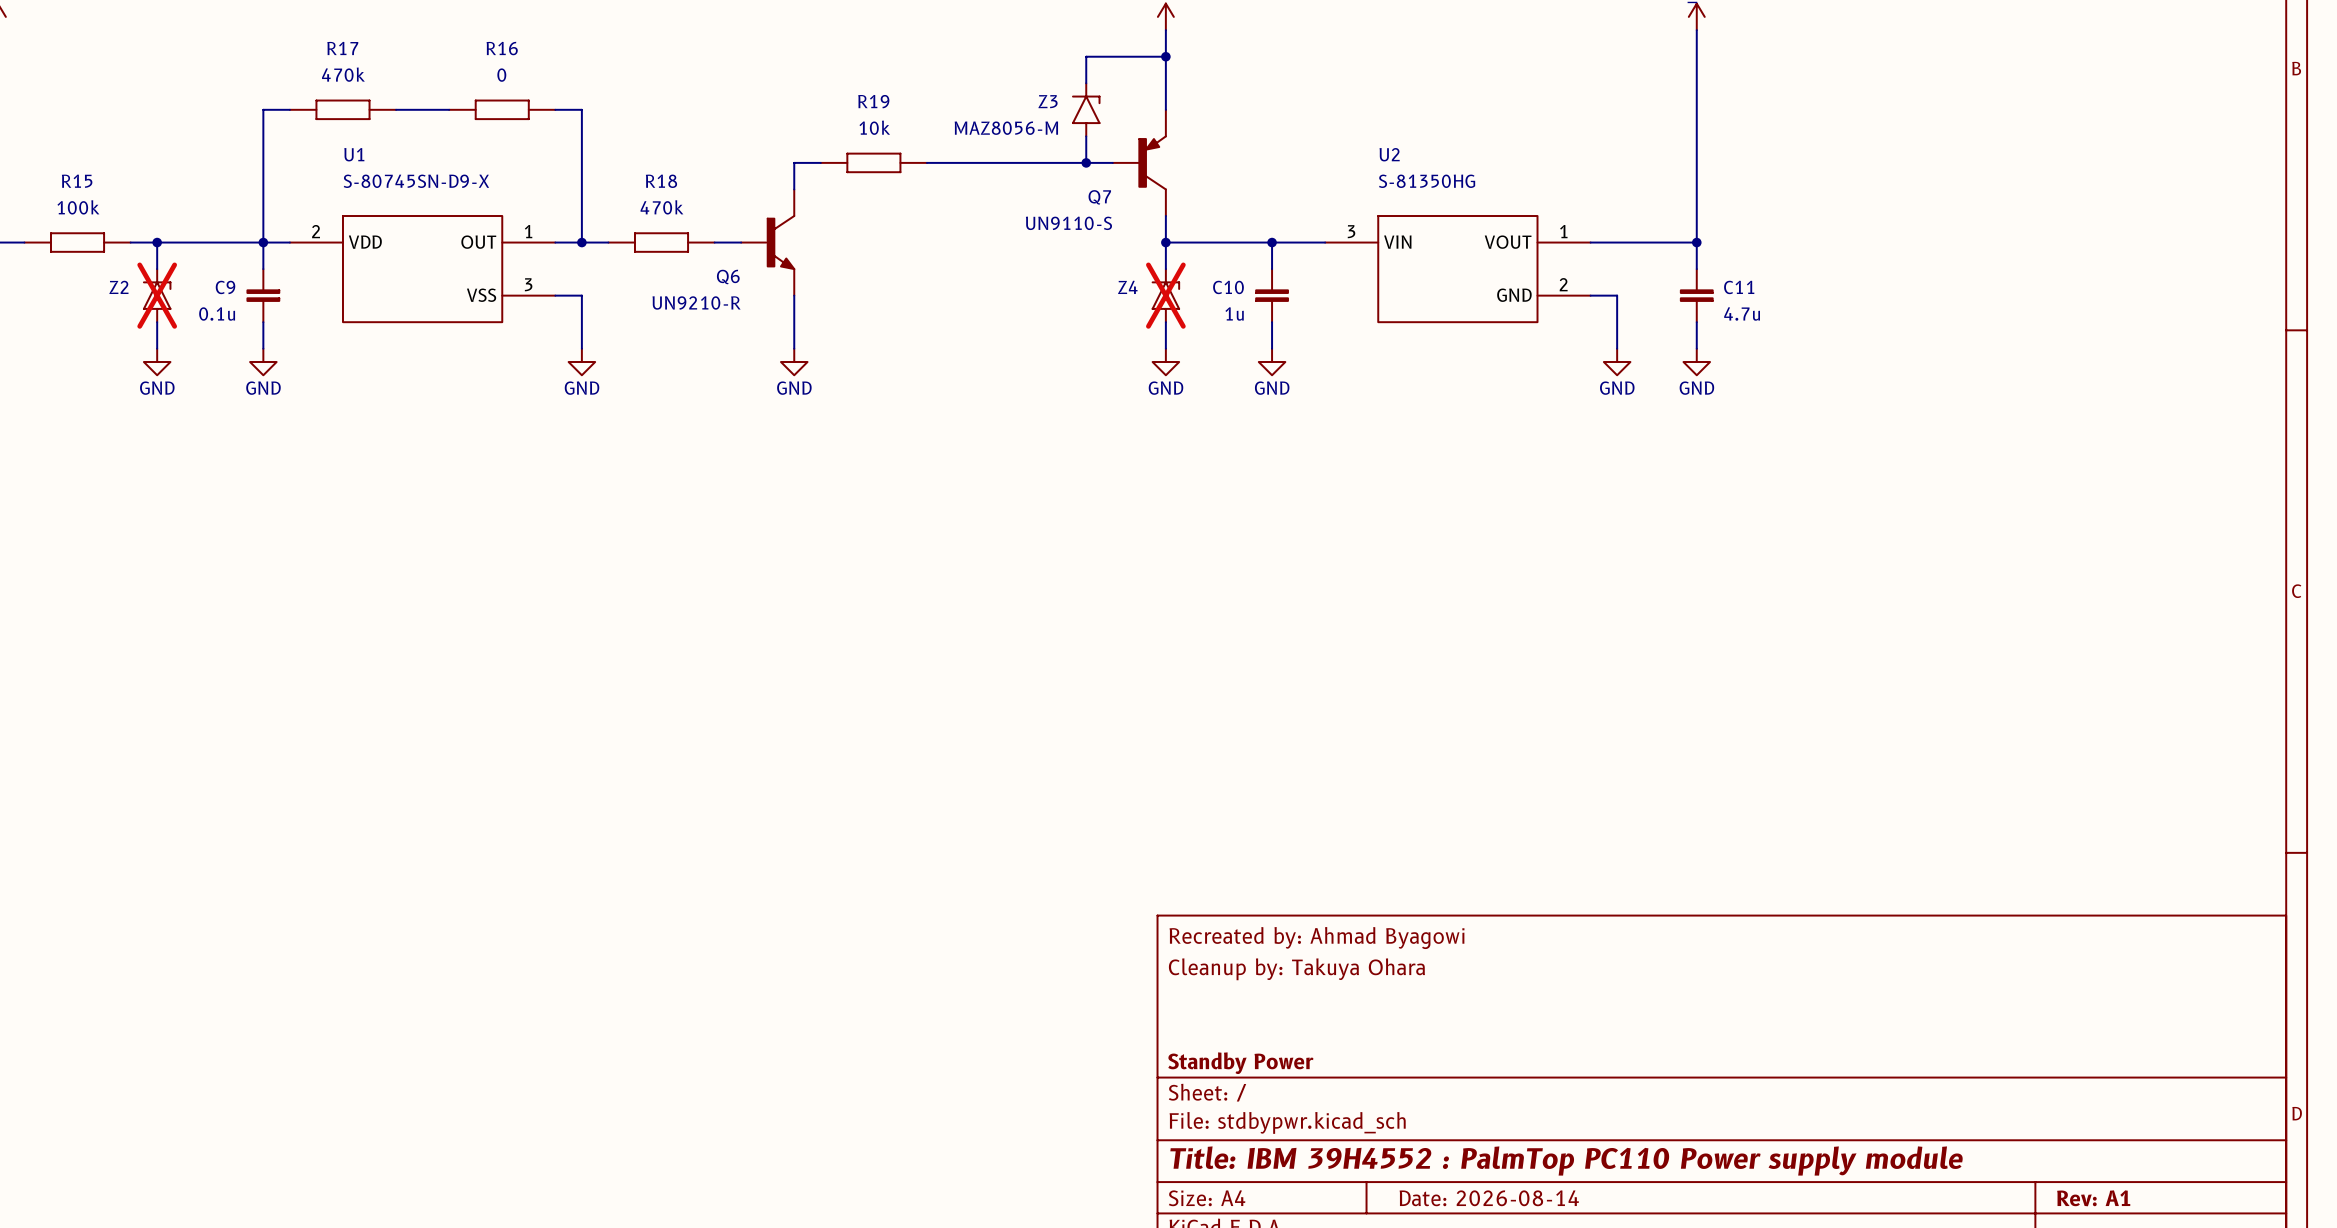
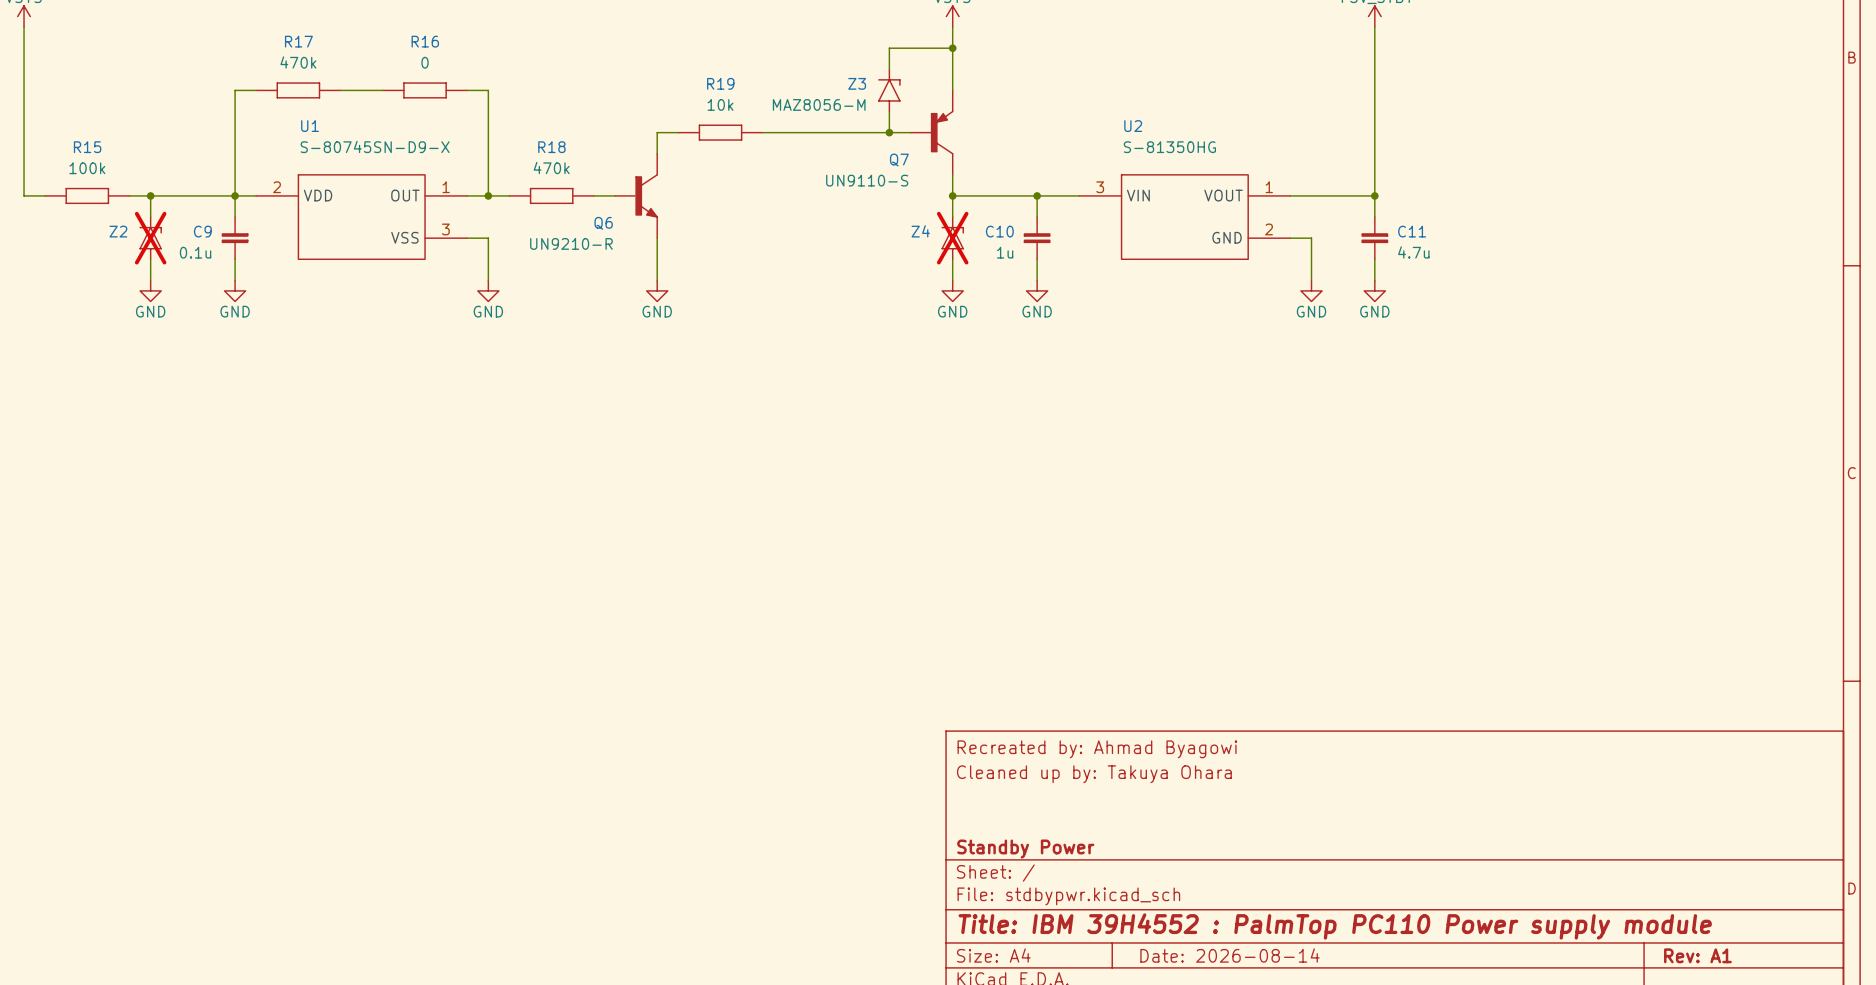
title block: Cleanup by: Takuya Ohara (1296, 969) -> Cleaned up by: Takuya Ohara (1094, 774)

